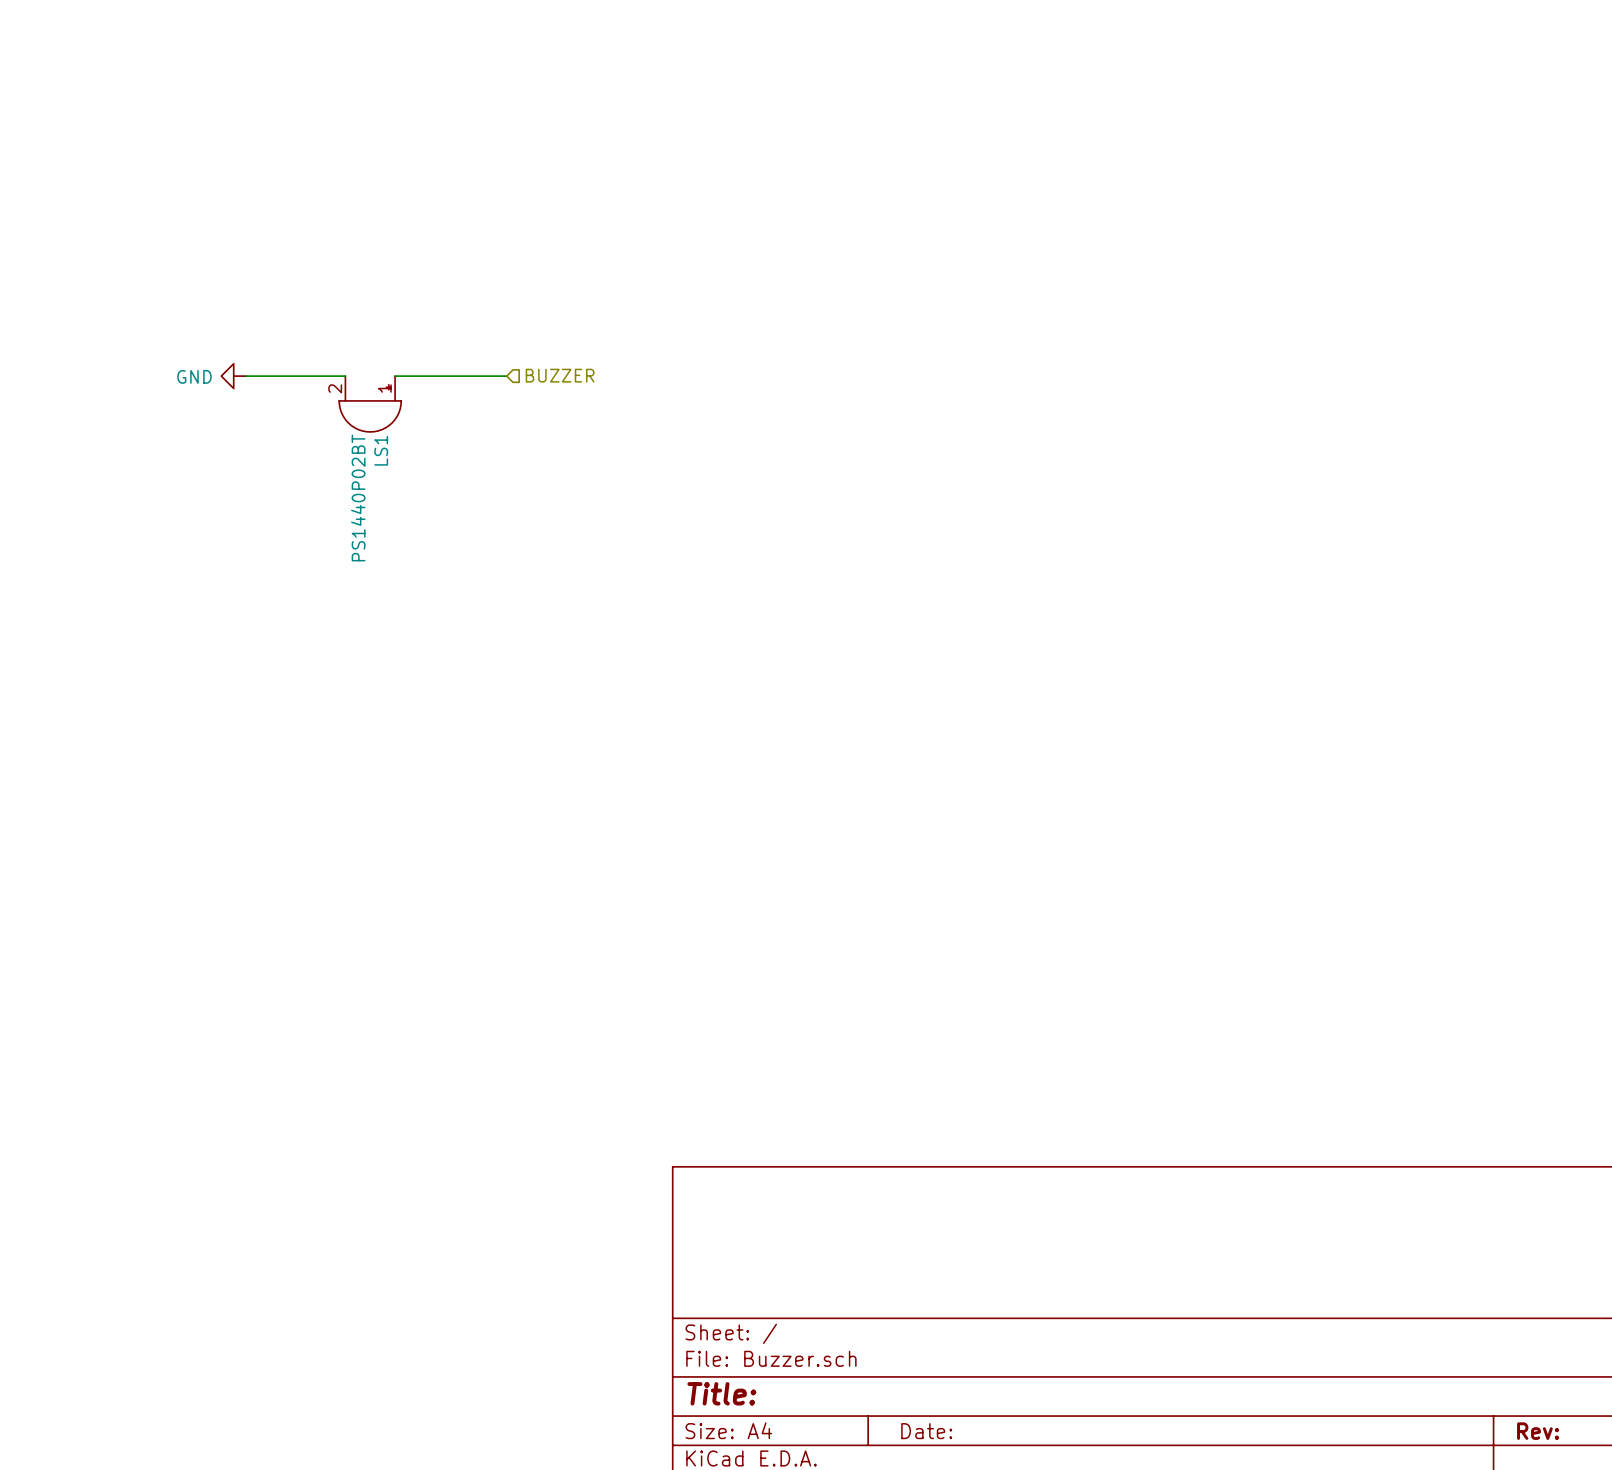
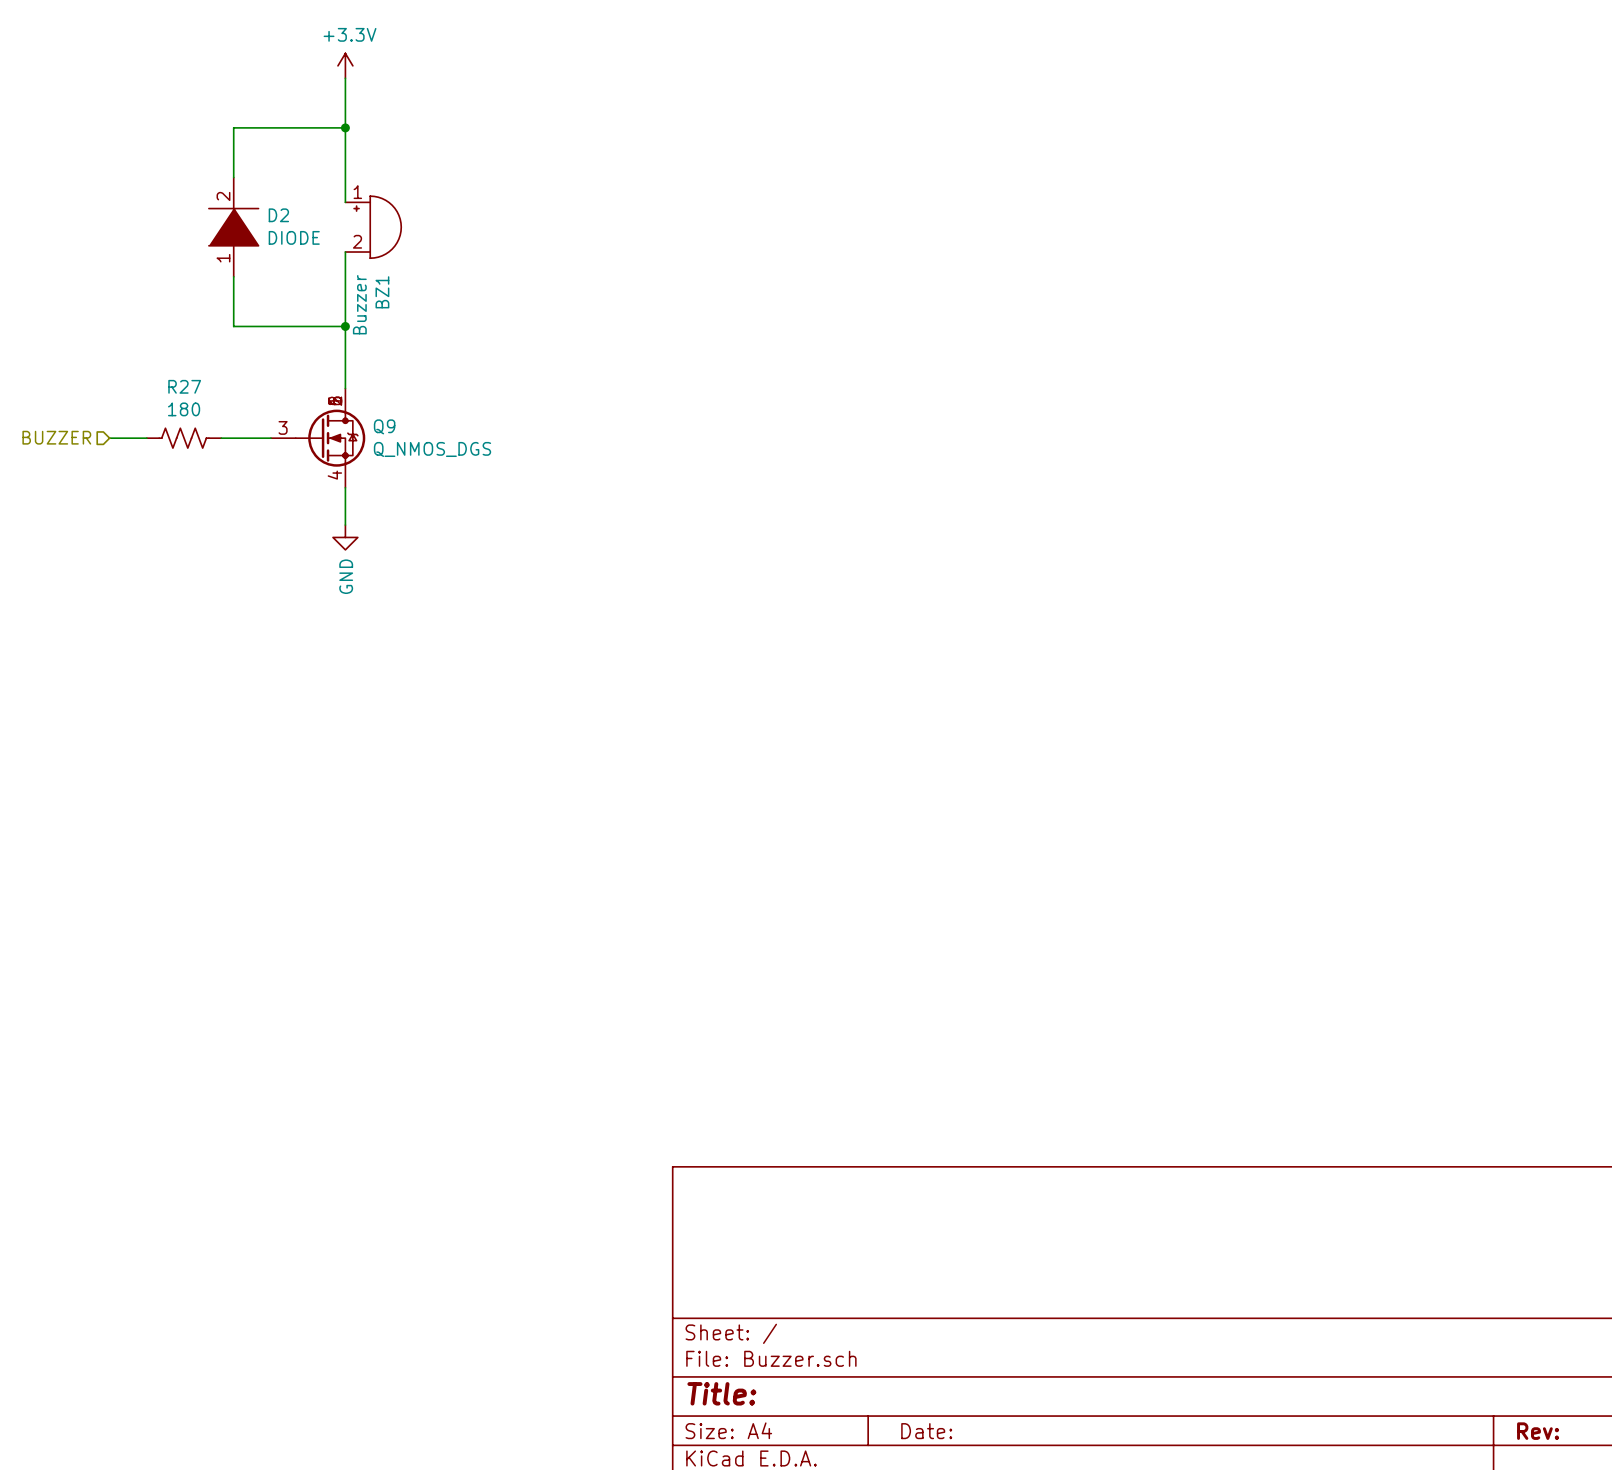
power symbol: none -> +3.3V (345, 65)
wire: none -> (345, 78) (345, 202)
wire: none -> (345, 127) (233, 127) (233, 177)
junction: none -> (345, 127)
D2: none -> DIODE (233, 227)
BZ1: none -> Buzzer (373, 227)
wire: none -> (345, 252) (345, 388)
wire: none -> (233, 276) (233, 326) (345, 326)
junction: none -> (345, 326)
hierarchical label: BUZZER (560, 375) -> none
power symbol rotation: 0° (233, 376) -> 90° counterclockwise (345, 537)
power symbol position: GND (233, 376) -> GND (345, 537)
wire: (246, 376) (345, 376) -> none
wire: (395, 376) (506, 376) -> none
LS1: PS1440P02BT (370, 404) -> none
hierarchical label: none -> BUZZER (56, 437)
wire: none -> (109, 438) (146, 438)
R27: none -> 180 (184, 438)
wire: none -> (221, 438) (270, 438)
Q9: none -> Q_NMOS_DGS (318, 438)
wire: none -> (345, 487) (345, 525)

